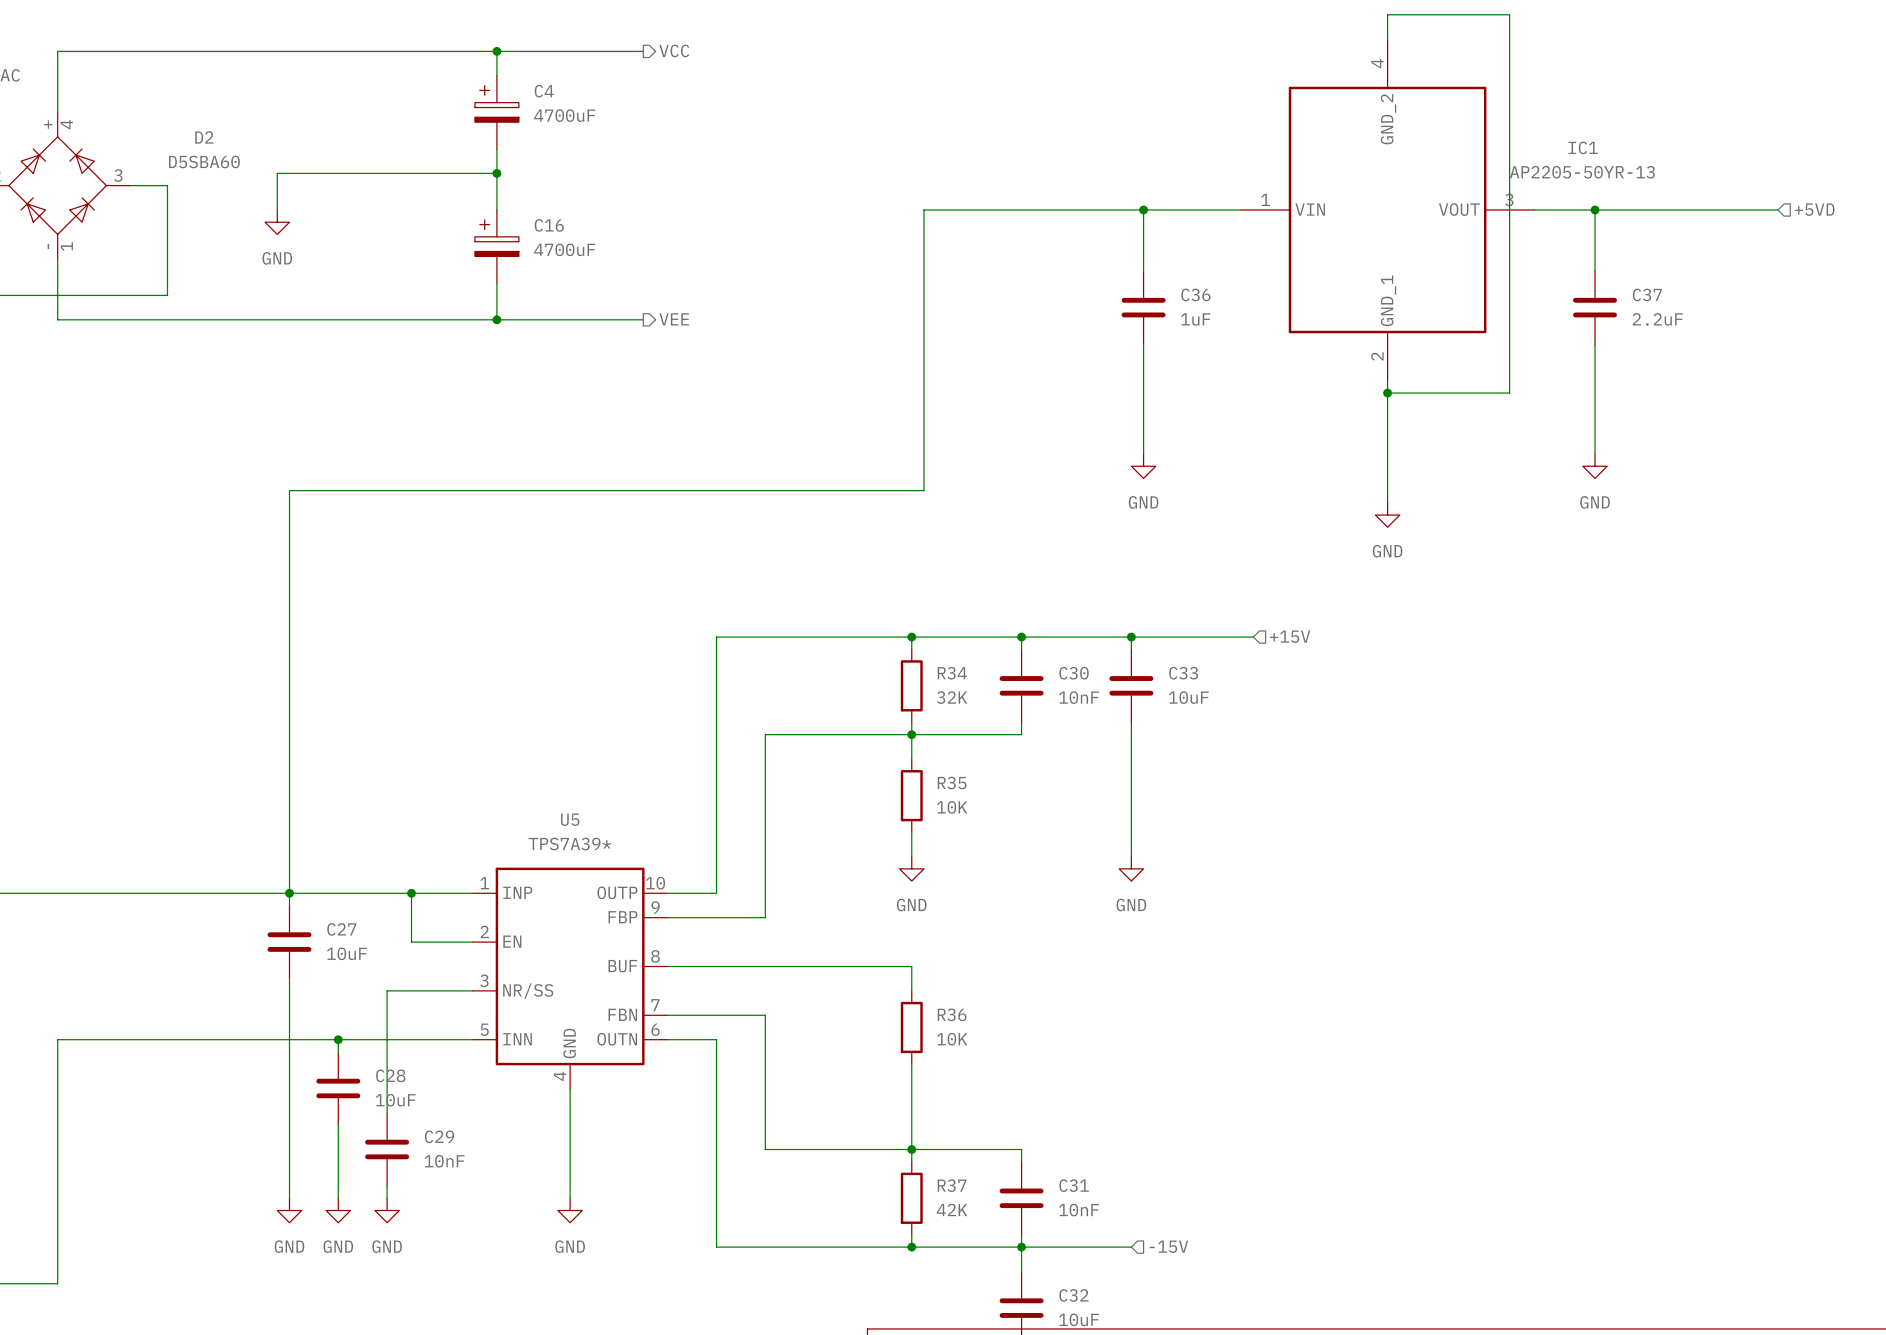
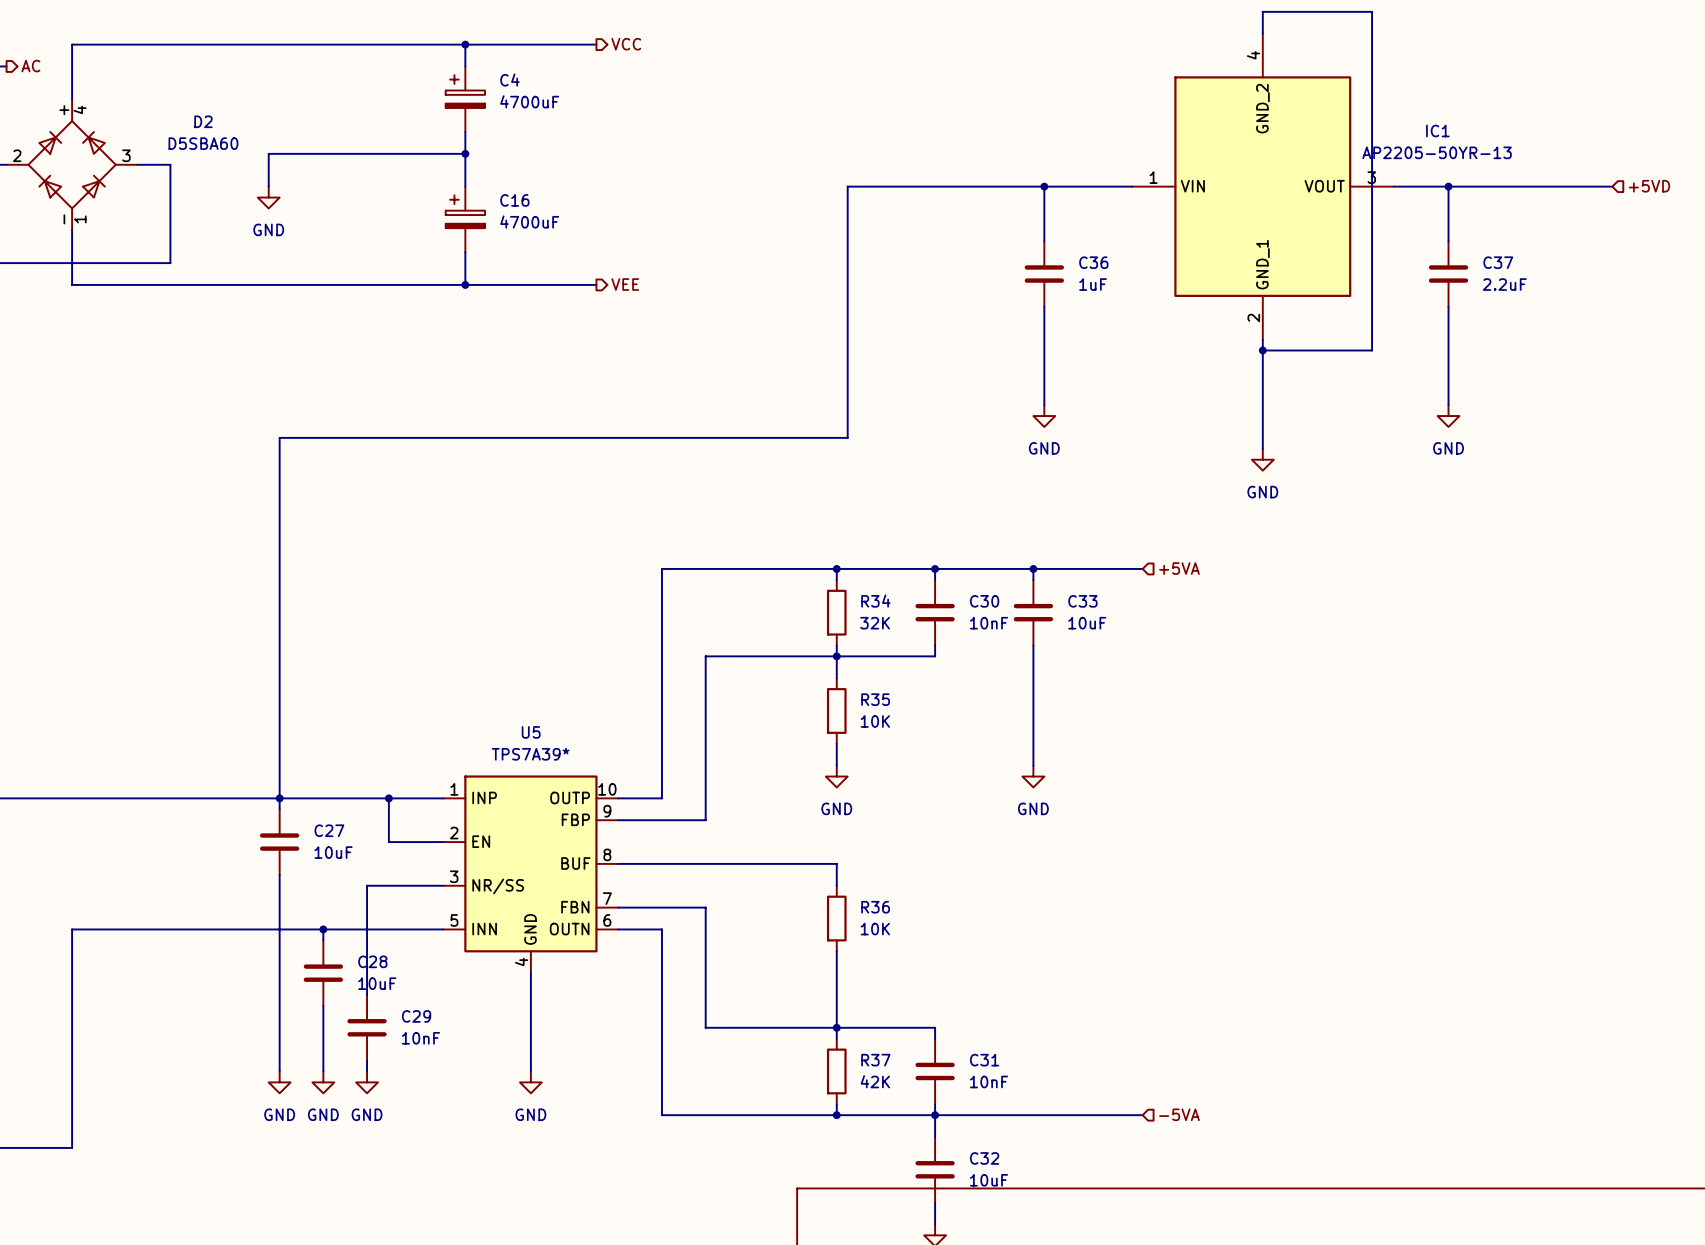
hierarchical label: +15V (1290, 636) -> +5VA (1179, 568)
hierarchical label: -15V (1168, 1246) -> none
hierarchical label: none -> -5VA (1179, 1114)
wire: none -> (1033, 1115) (1142, 1115)

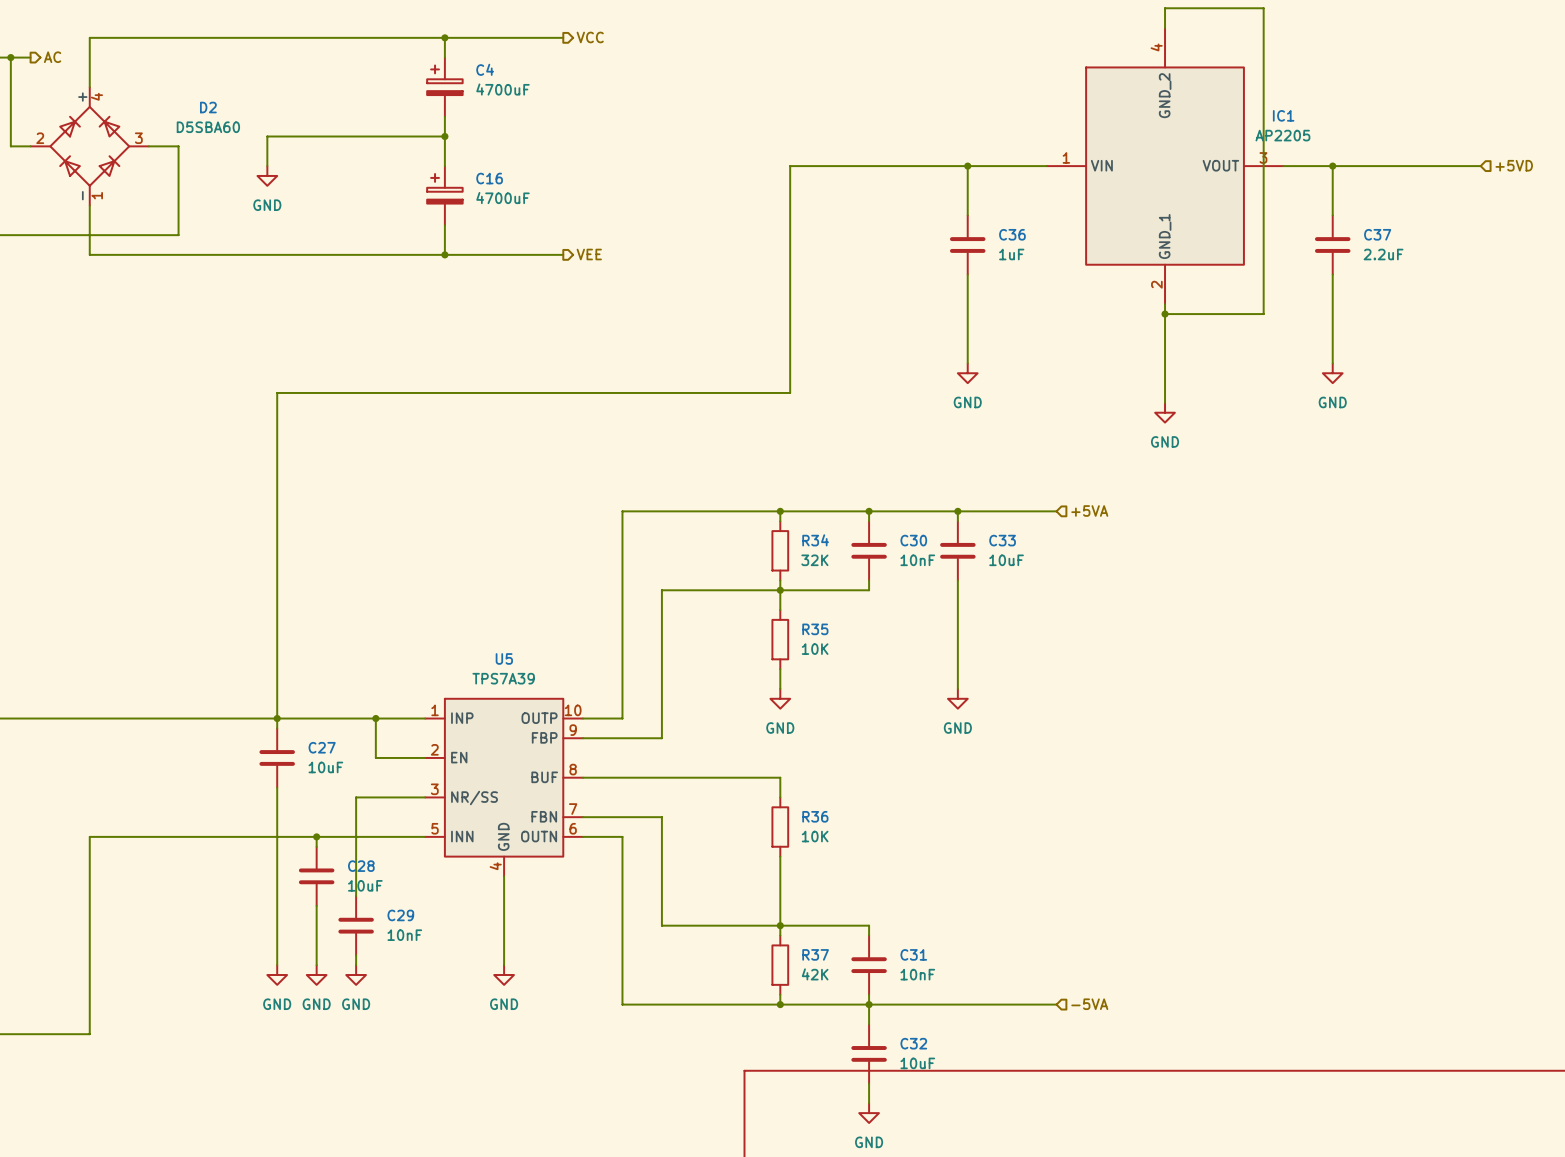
IC1 name position: IC1 (1437, 131) -> IC1 (1283, 115)
IC1 value: AP2205-50YR-13 (1437, 152) -> AP2205 (1282, 135)
U5 value: TPS7A39* (530, 754) -> TPS7A39 (503, 678)

